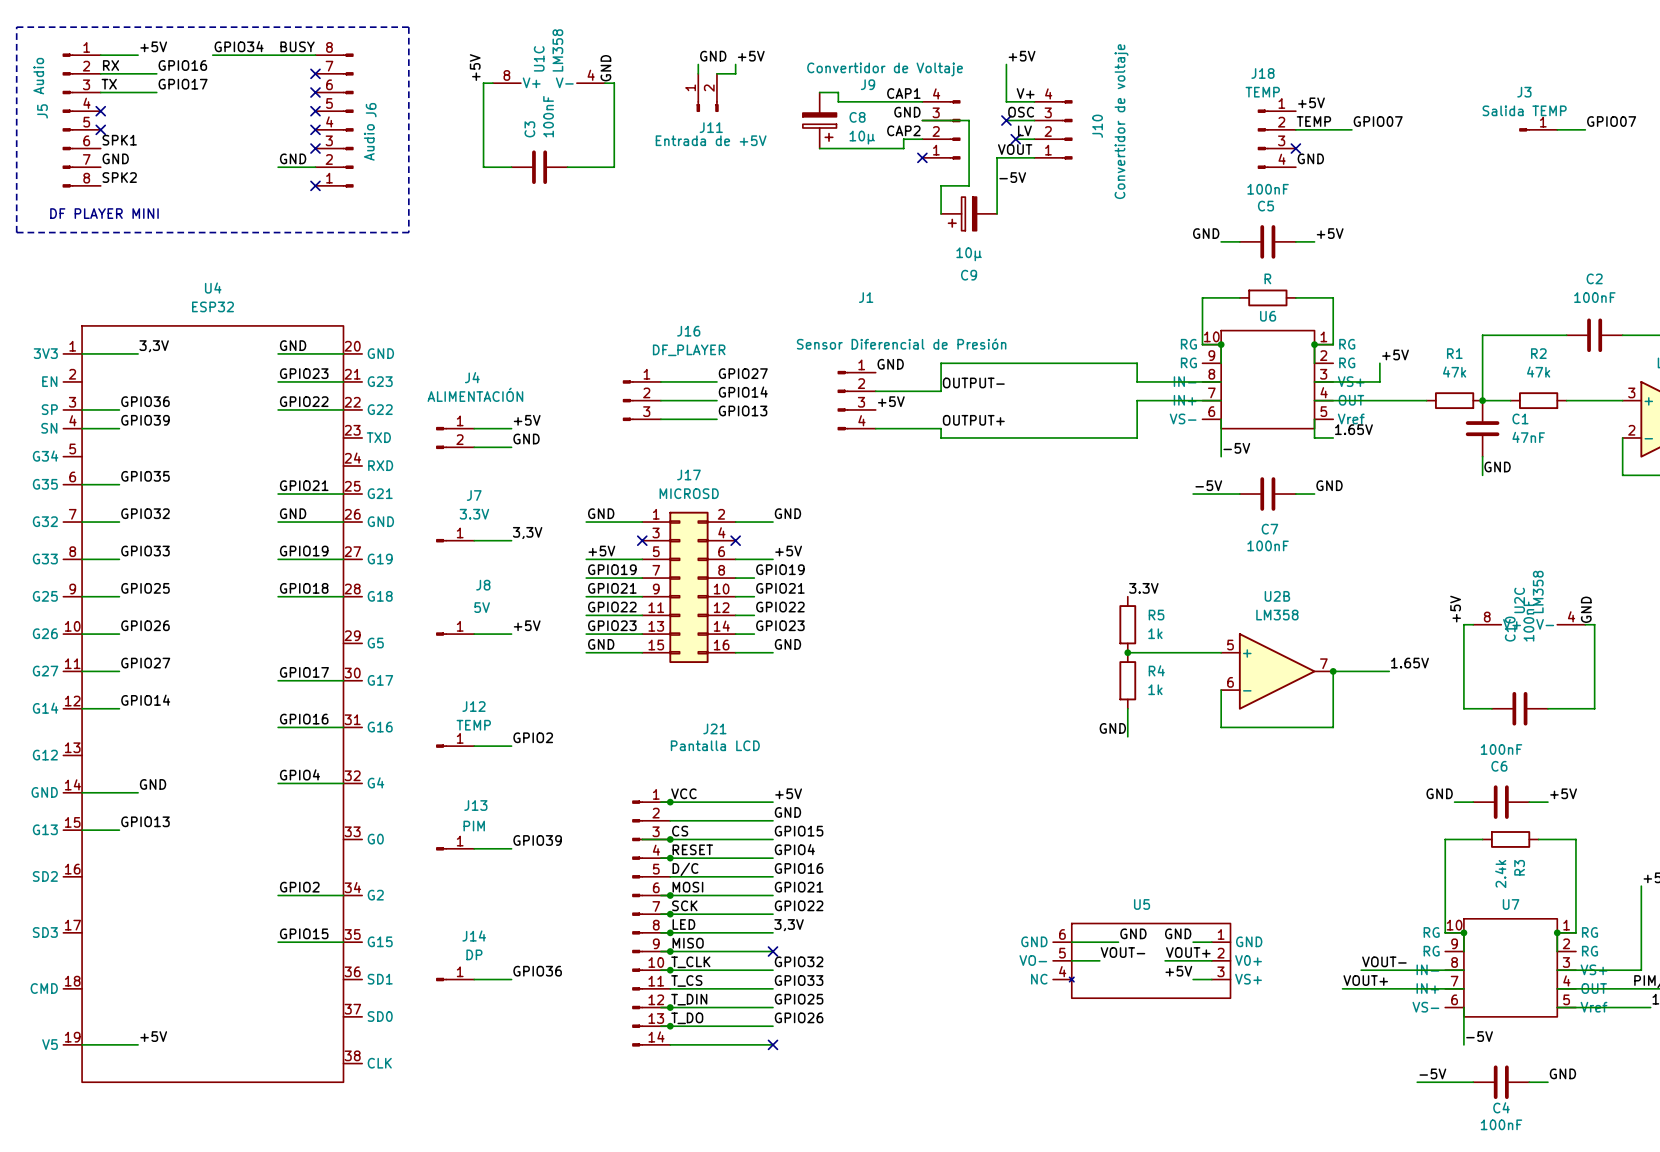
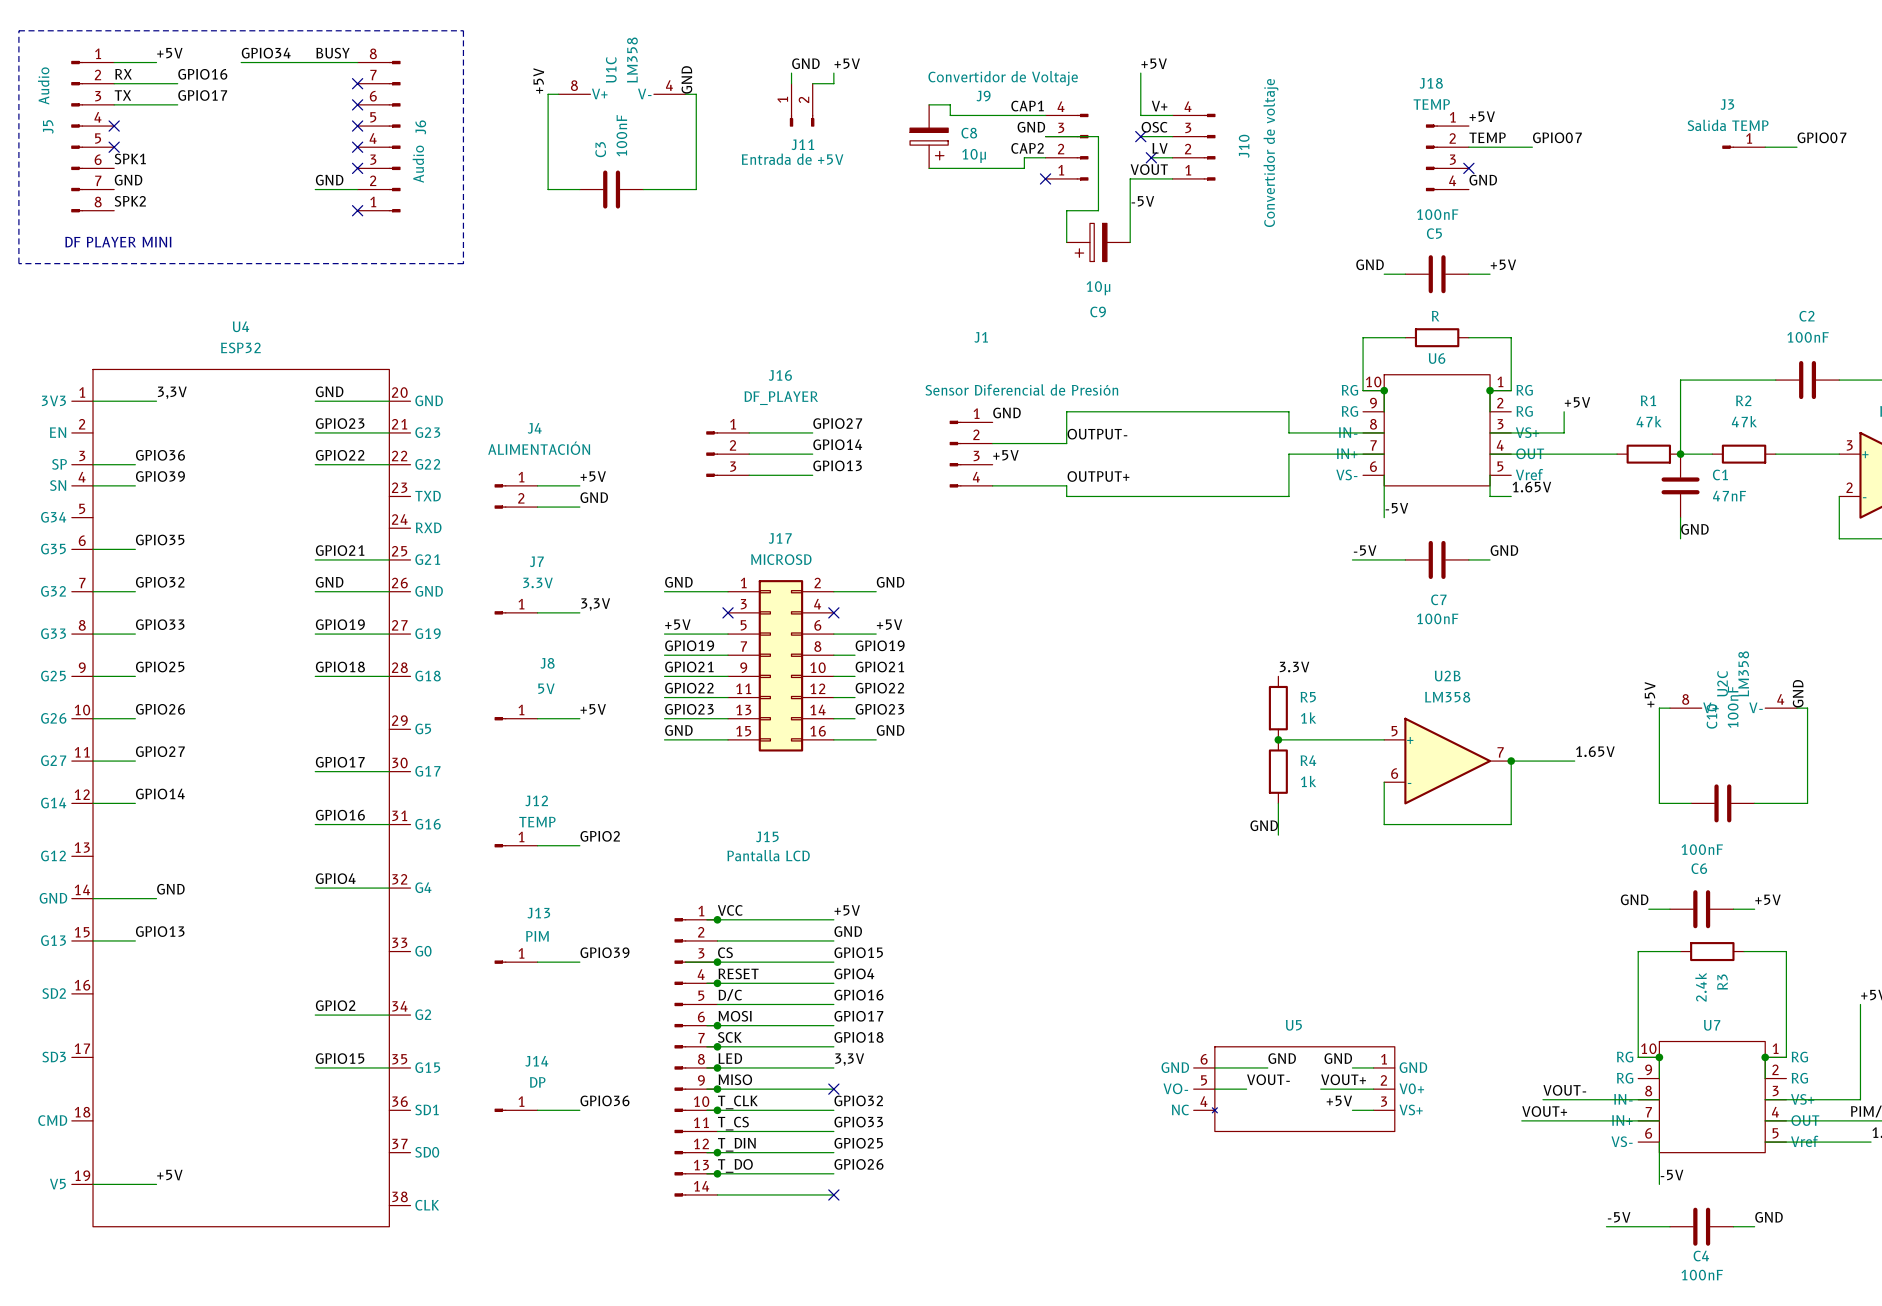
label position: VCC (683, 793) -> VCC (730, 910)
label position: +5V (788, 793) -> +5V (847, 910)
wire: (660, 802) (772, 802) -> (706, 919) (833, 919)
junction: (670, 802) -> none
junction: none -> (717, 919)
label position: GND (787, 812) -> GND (848, 931)
wire: (670, 820) (772, 820) -> (717, 940) (833, 940)
label position: CS (680, 831) -> CS (725, 952)
label position: GPIO15 (799, 831) -> GPIO15 (858, 952)
wire: (642, 839) (772, 839) -> (685, 962) (833, 962)
junction: (670, 839) -> none
junction: none -> (717, 962)
label position: RESET (692, 849) -> RESET (738, 973)
label position: GPIO4 (794, 849) -> GPIO4 (854, 973)
wire: (660, 858) (772, 858) -> (706, 983) (833, 983)
junction: (670, 858) -> none
junction: none -> (717, 983)
label position: GPIO16 (799, 868) -> GPIO16 (858, 995)
label position: D/C (685, 869) -> D/C (730, 995)
wire: (670, 876) (772, 876) -> (717, 1004) (833, 1004)
label position: MOSI (687, 887) -> MOSI (735, 1016)
label: GPIO21 (799, 887) -> none
wire: (660, 895) (772, 895) -> (706, 1025) (833, 1025)
junction: (670, 895) -> none
label: none -> GPIO17 (858, 1016)
junction: none -> (717, 1025)
label position: SCK (684, 905) -> SCK (729, 1037)
label: GPIO22 (799, 905) -> none
wire: (660, 914) (772, 914) -> (706, 1046) (833, 1046)
junction: (670, 914) -> none
label: none -> GPIO18 (858, 1037)
junction: none -> (717, 1046)
J21: Pantalla LCD (651, 923) -> none
label position: LED (683, 924) -> LED (730, 1058)
label position: 3,3V (789, 925) -> 3,3V (849, 1059)
J15: none -> Pantalla LCD (695, 1057)
wire: (660, 932) (772, 932) -> (706, 1067) (833, 1067)
junction: (670, 932) -> none
junction: none -> (717, 1067)
label position: MISO (688, 943) -> MISO (735, 1079)
wire: (660, 951) (772, 951) -> (706, 1089) (833, 1089)
junction: (670, 951) -> none
no-connect mark position: (772, 951) -> (833, 1089)
junction: none -> (717, 1089)
label position: GPIO32 (799, 961) -> GPIO32 (858, 1100)
label position: T_CLK (690, 962) -> T_CLK (737, 1102)
wire: (660, 970) (772, 970) -> (706, 1110) (833, 1110)
junction: (670, 970) -> none
junction: none -> (717, 1110)
label position: T_CS (686, 980) -> T_CS (733, 1123)
label position: GPIO33 (799, 980) -> GPIO33 (858, 1122)
wire: (670, 988) (772, 988) -> (717, 1131) (833, 1131)
label position: T_DIN (689, 999) -> T_DIN (736, 1144)
label position: GPIO25 (799, 999) -> GPIO25 (858, 1143)
wire: (660, 1007) (772, 1007) -> (706, 1152) (833, 1152)
junction: (670, 1007) -> none
junction: none -> (717, 1152)
label position: GPIO26 (799, 1017) -> GPIO26 (858, 1164)
label position: T_DO (687, 1018) -> T_DO (735, 1165)
wire: (660, 1026) (772, 1026) -> (706, 1173) (833, 1173)
junction: (670, 1026) -> none
junction: none -> (717, 1173)
wire: (670, 1044) (772, 1044) -> (717, 1194) (833, 1194)
no-connect mark position: (772, 1044) -> (833, 1194)

